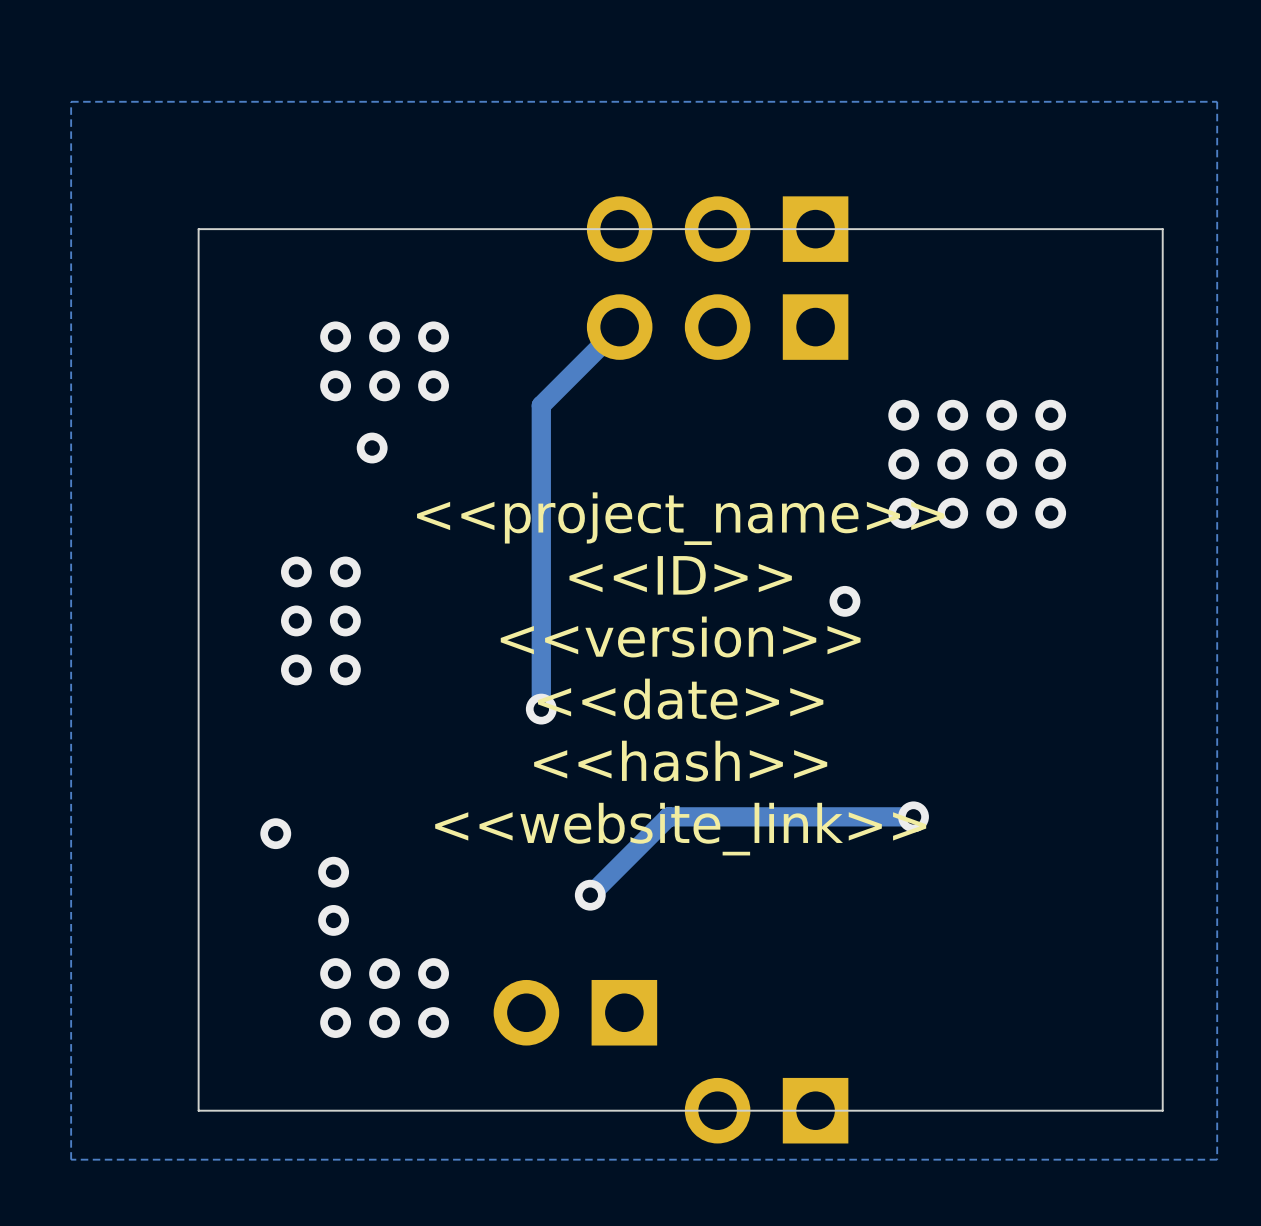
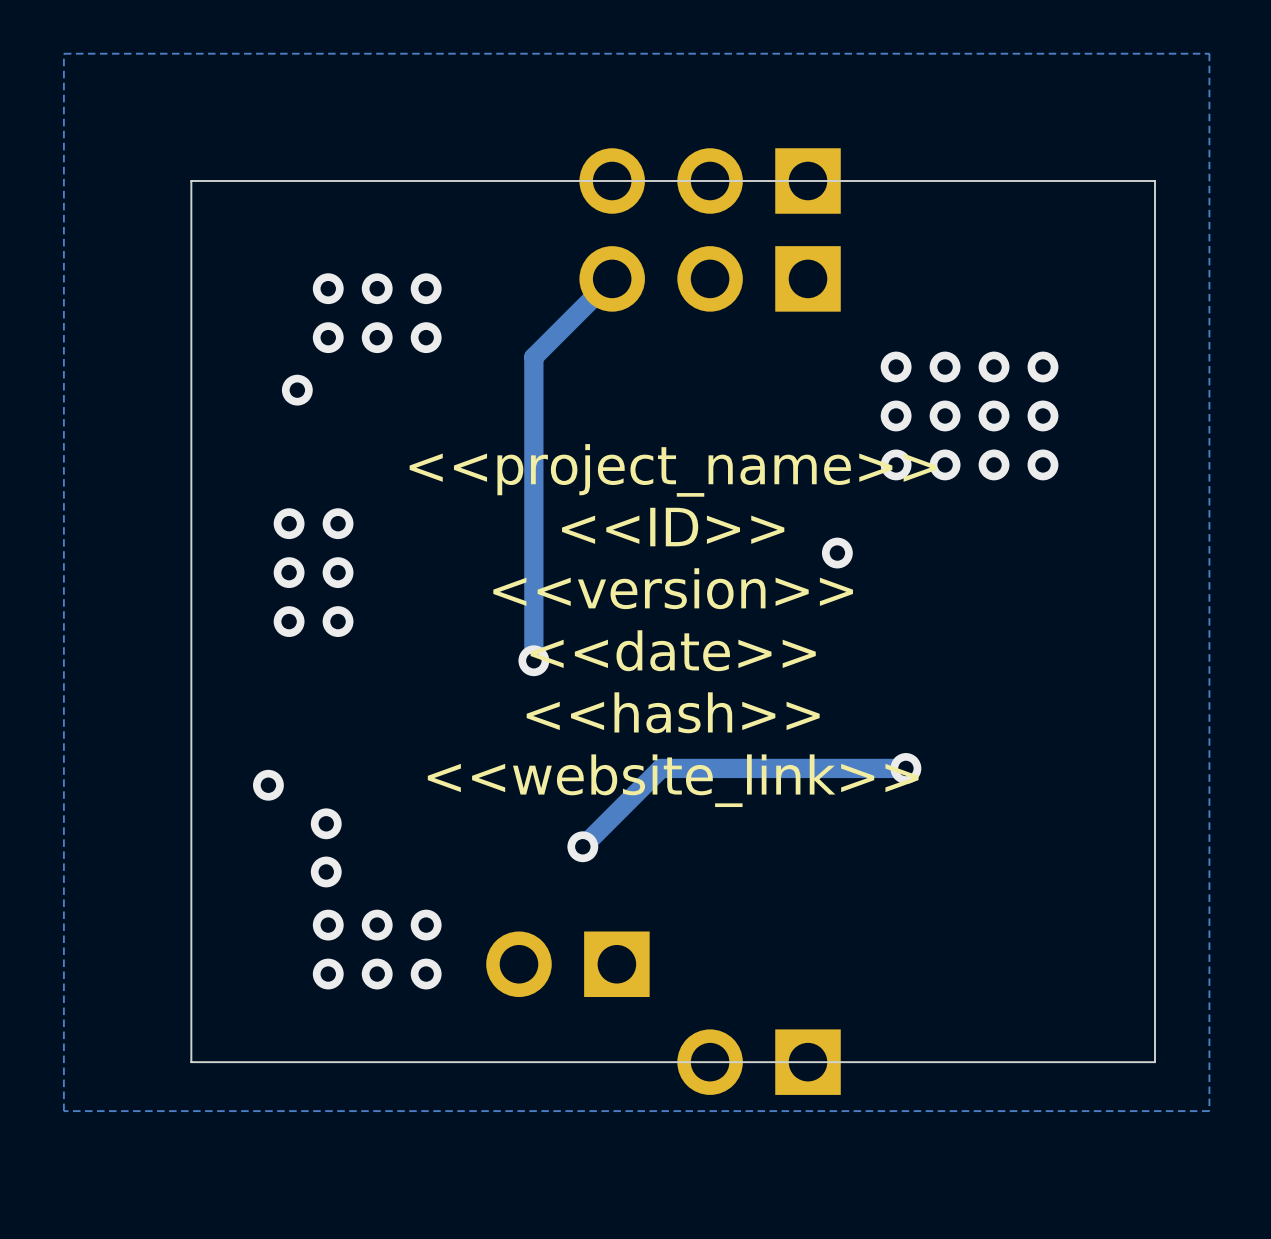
via position: (372, 448) -> (297, 390)

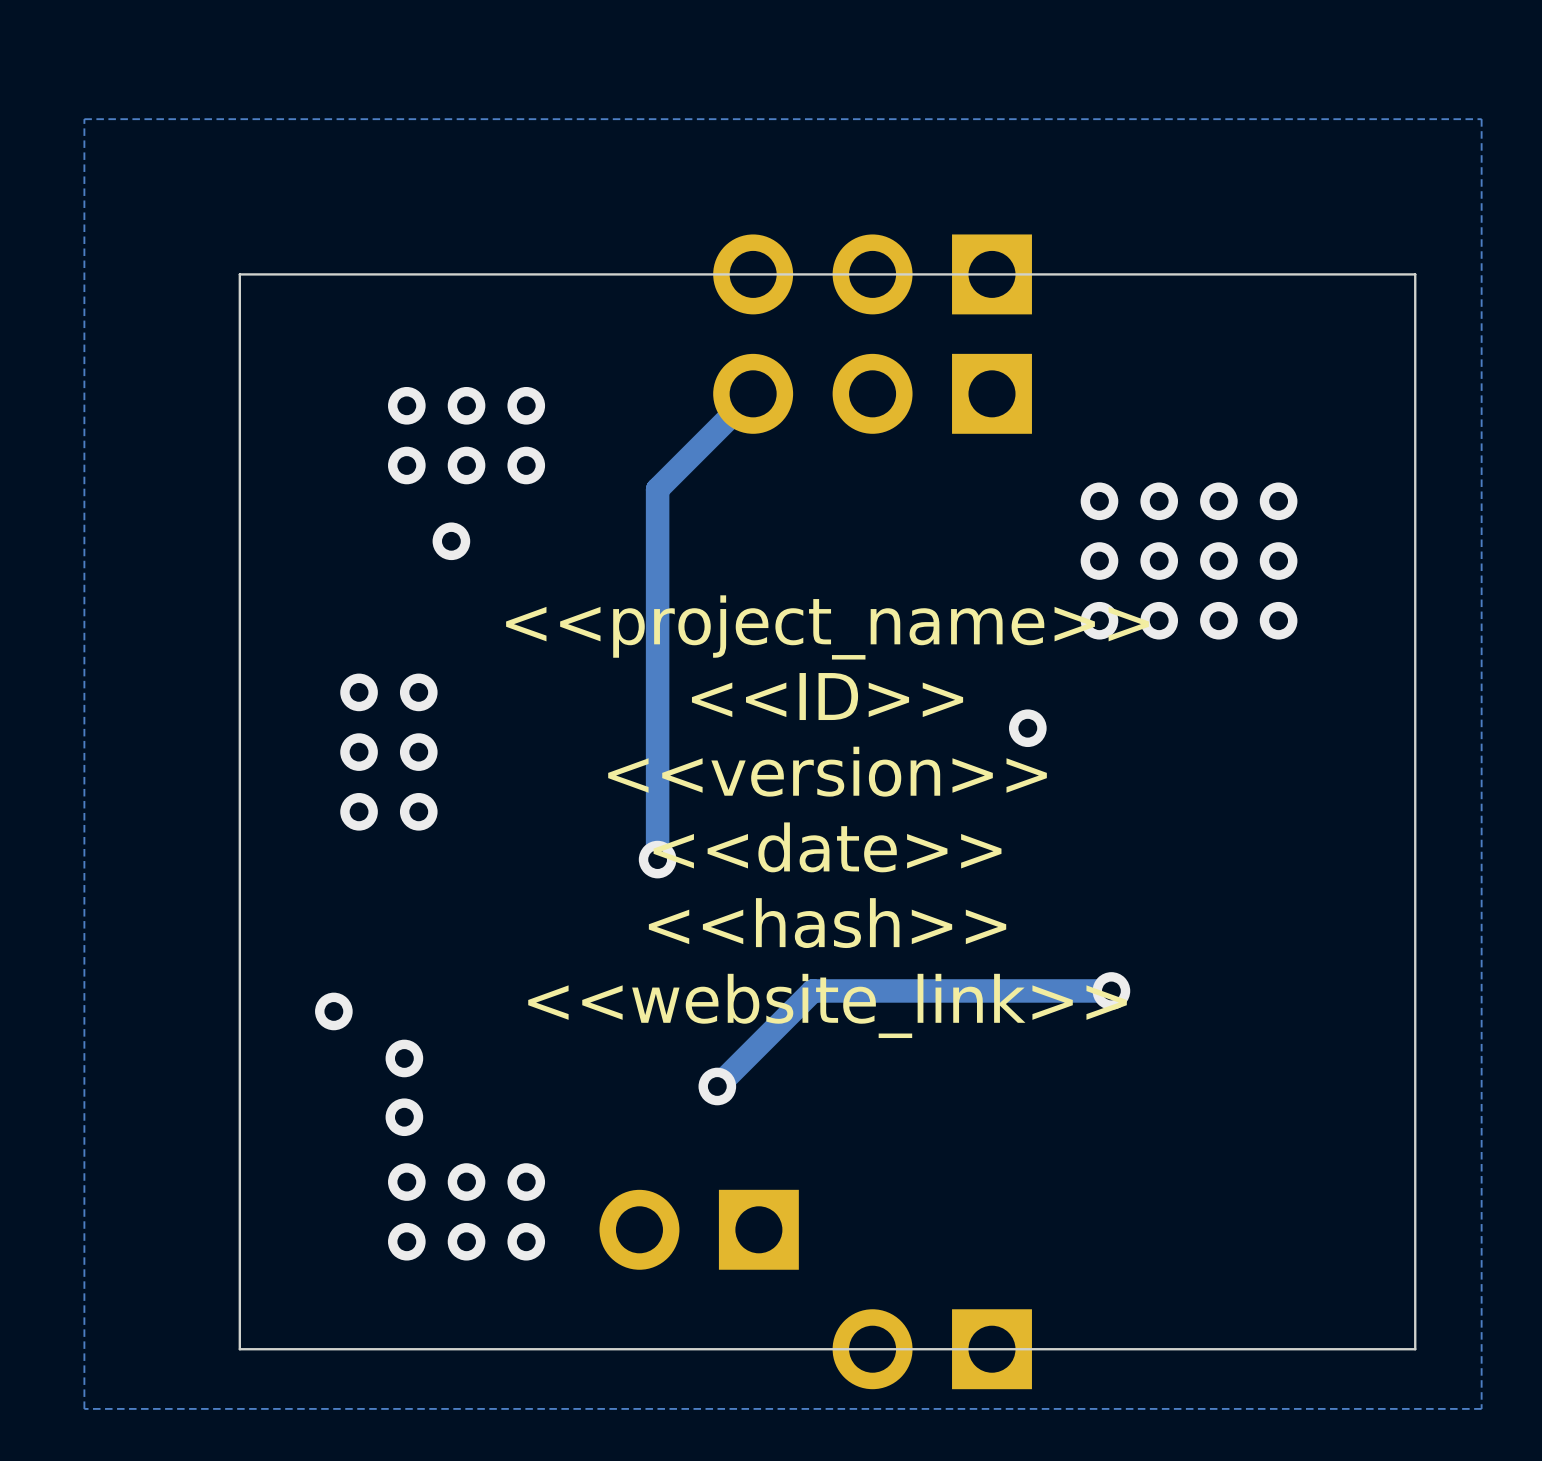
via position: (297, 390) -> (451, 541)

